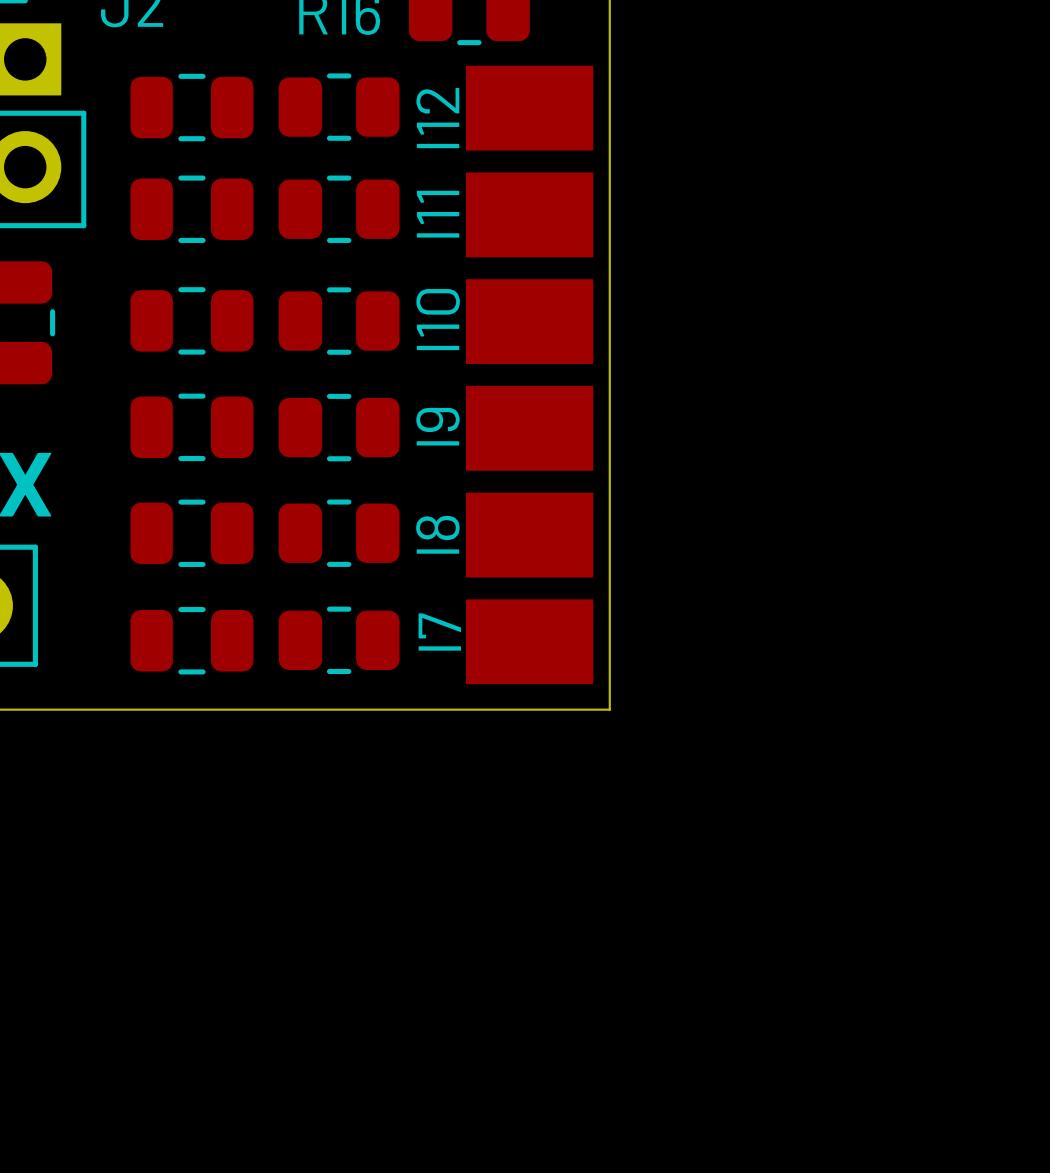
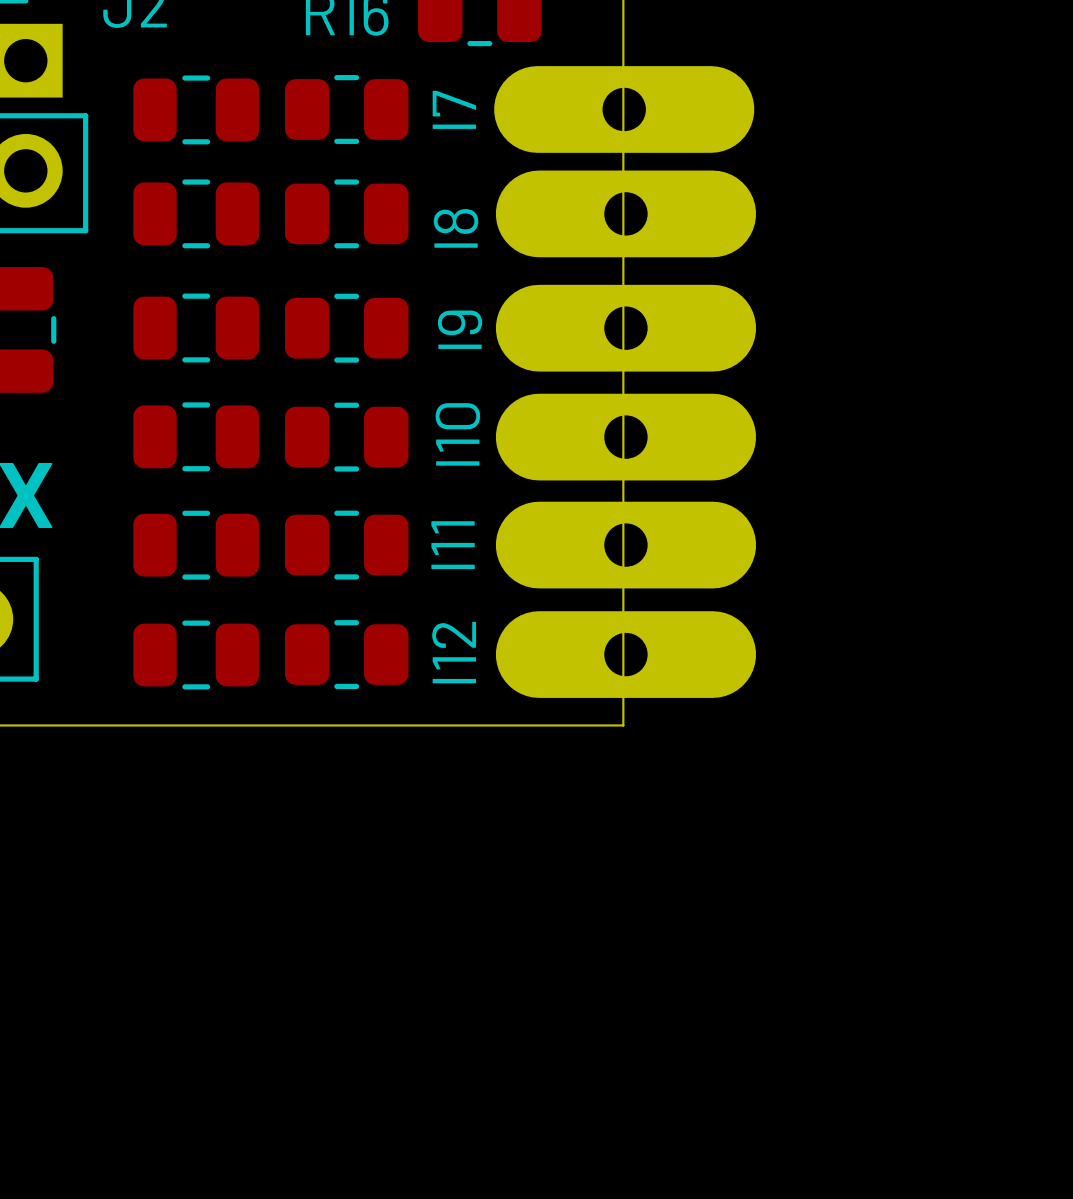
I12 footprint: [465, 65, 594, 151] -> [495, 611, 757, 698]
I11 footprint: [465, 172, 594, 258] -> [495, 501, 757, 589]
I10 footprint: [465, 279, 594, 365] -> [495, 393, 757, 481]
I9 footprint: [465, 385, 594, 471] -> [495, 284, 757, 372]
I8 footprint: [465, 492, 594, 578] -> [495, 170, 757, 258]
I7 footprint: [465, 599, 594, 685] -> [494, 66, 755, 153]

